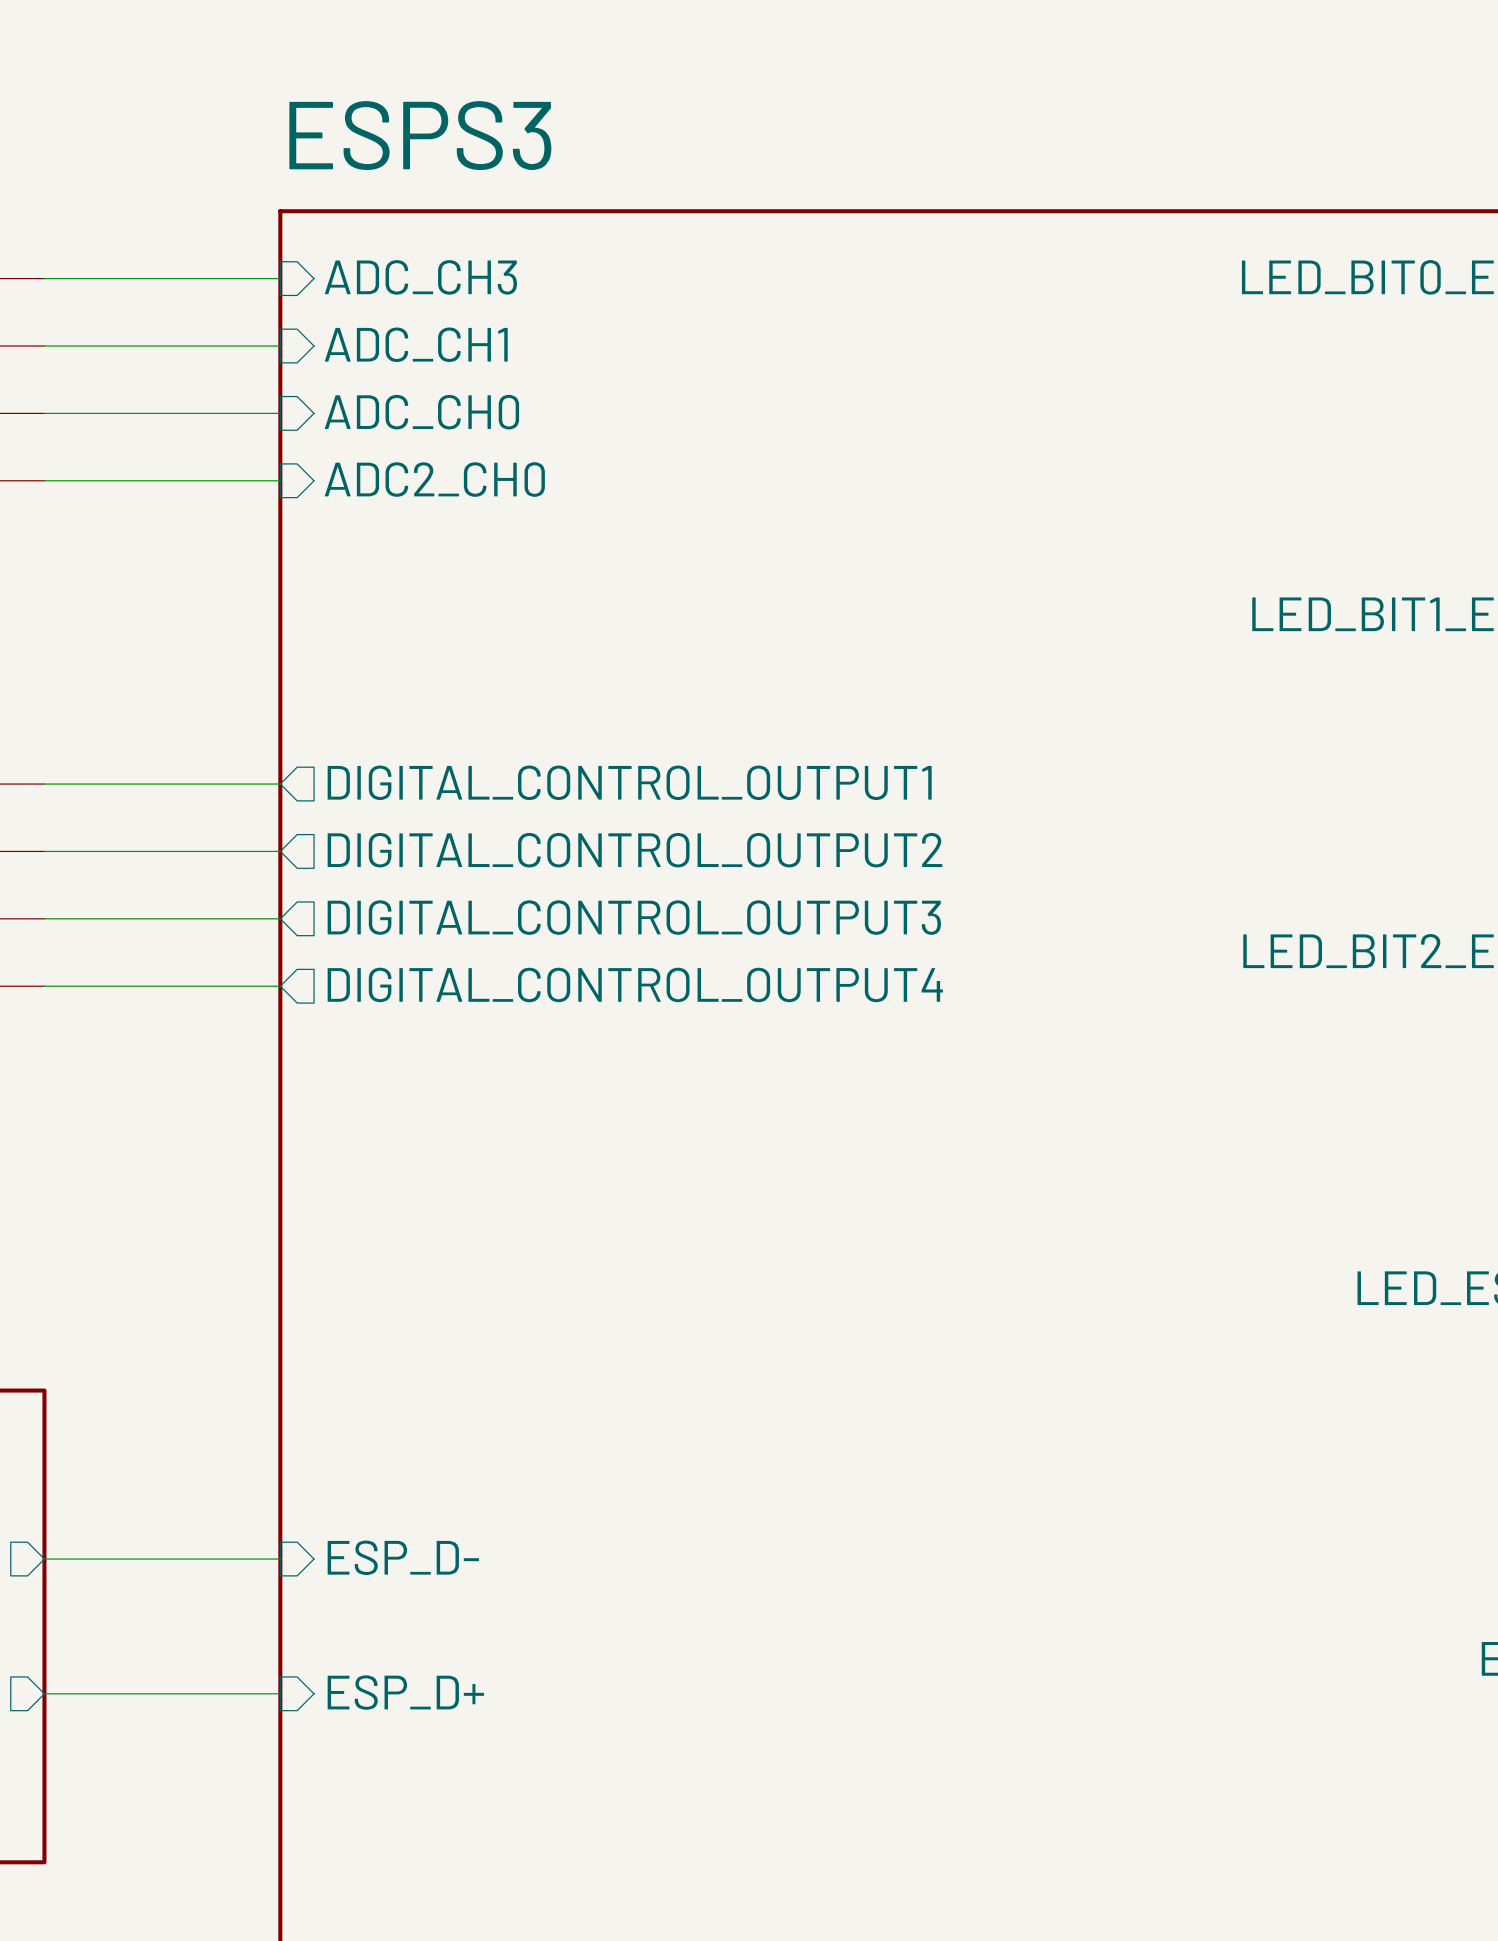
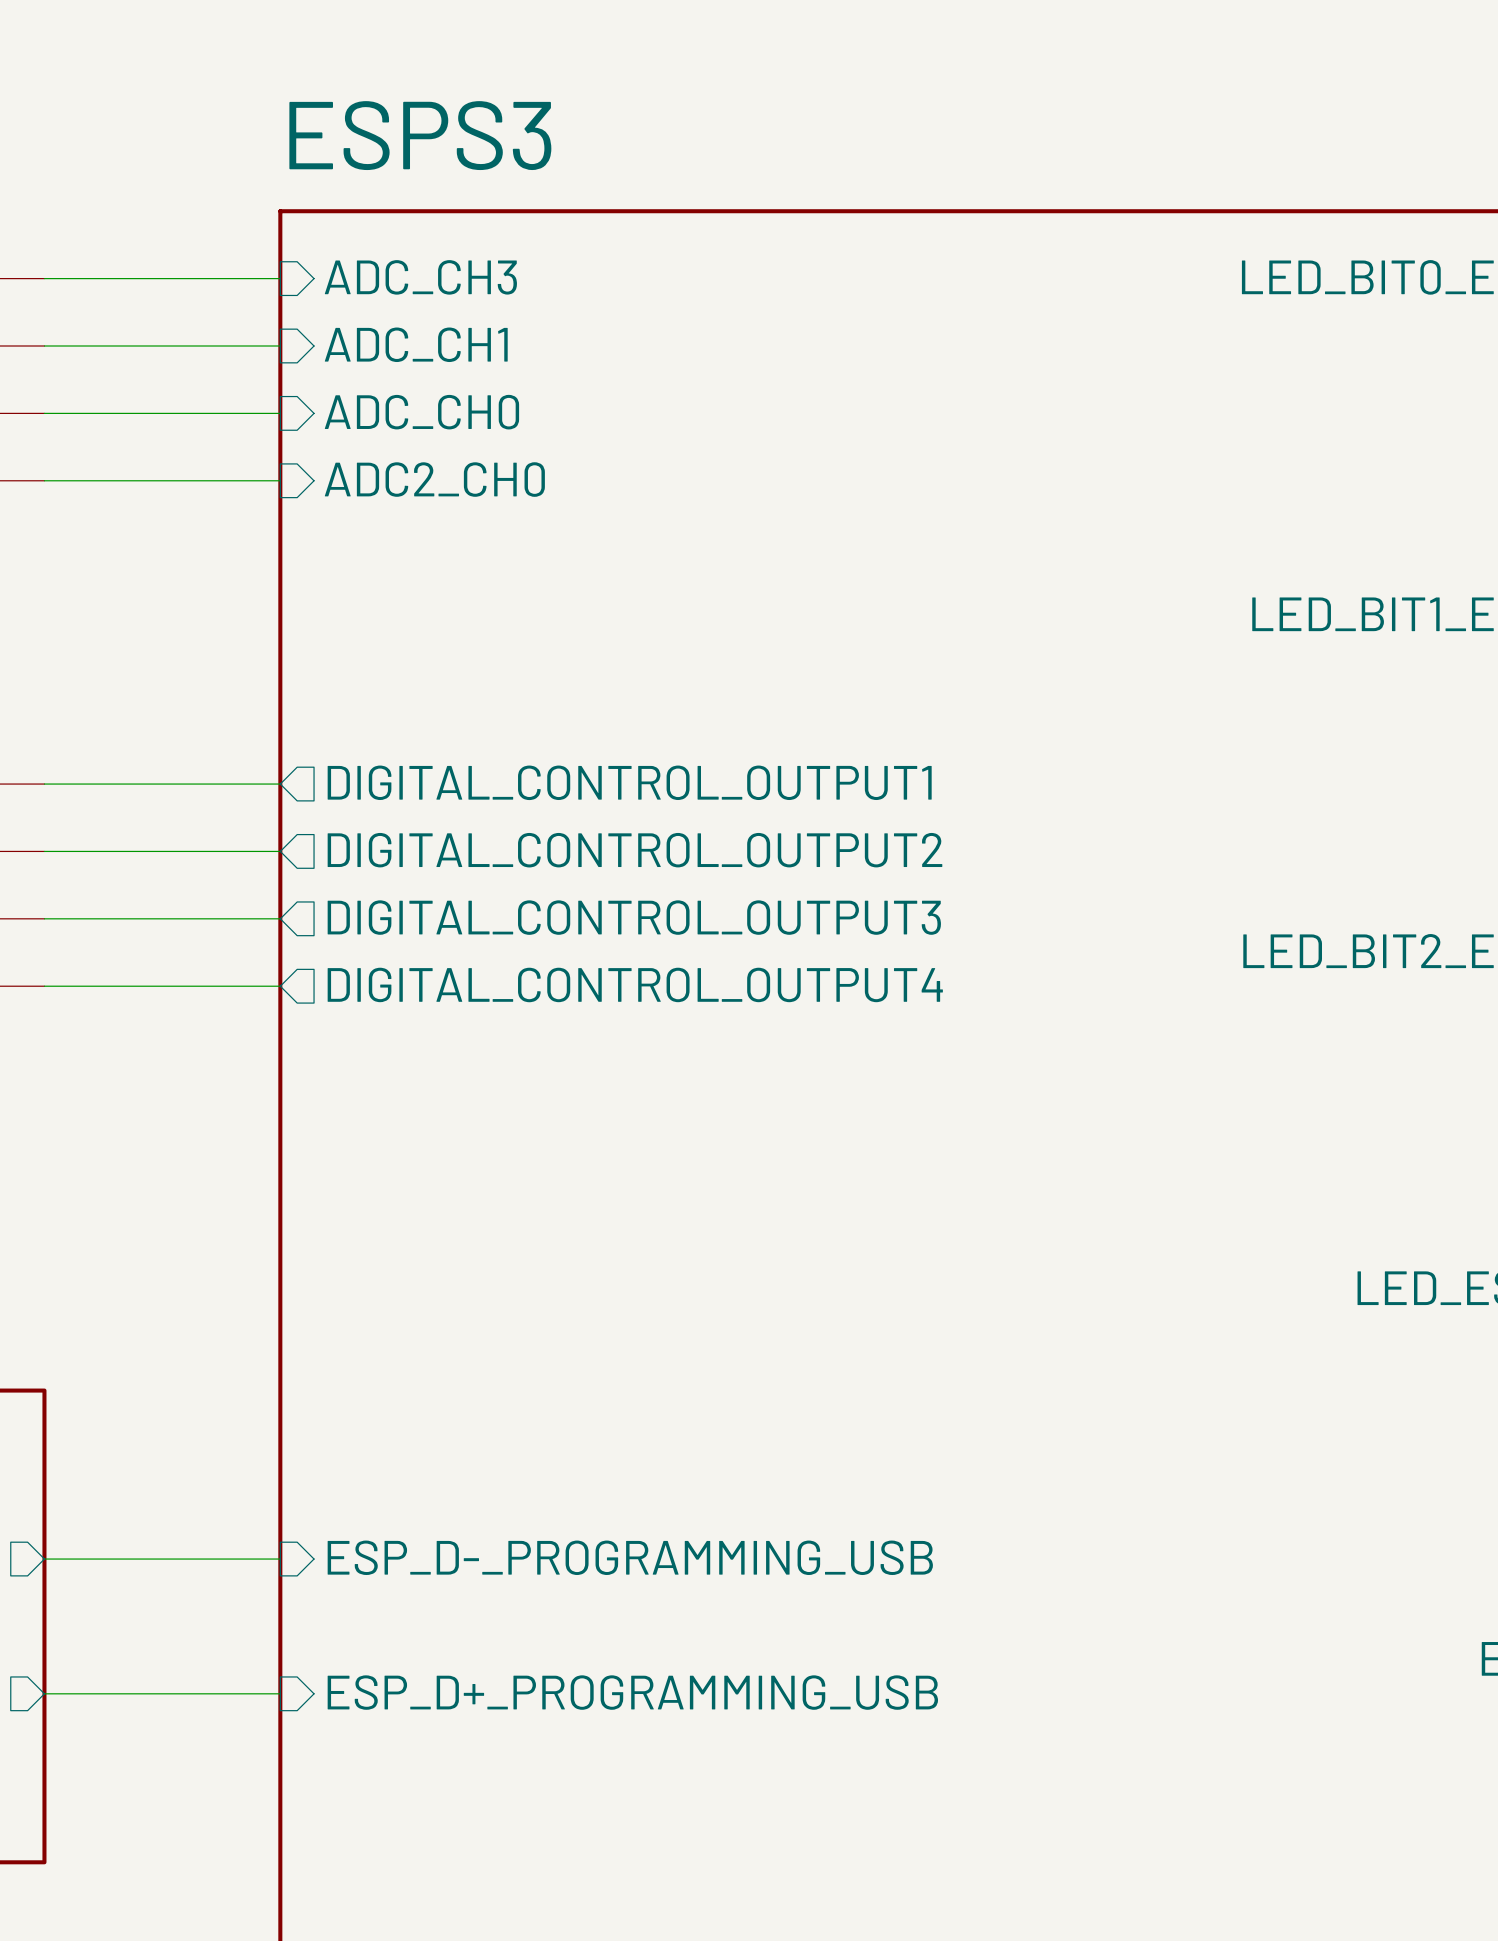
sheet pin: ESP_D- (403, 1557) -> ESP_D-_PROGRAMMING_USB (630, 1557)
sheet pin: ESP_D+ (405, 1692) -> ESP_D+_PROGRAMMING_USB (632, 1692)

